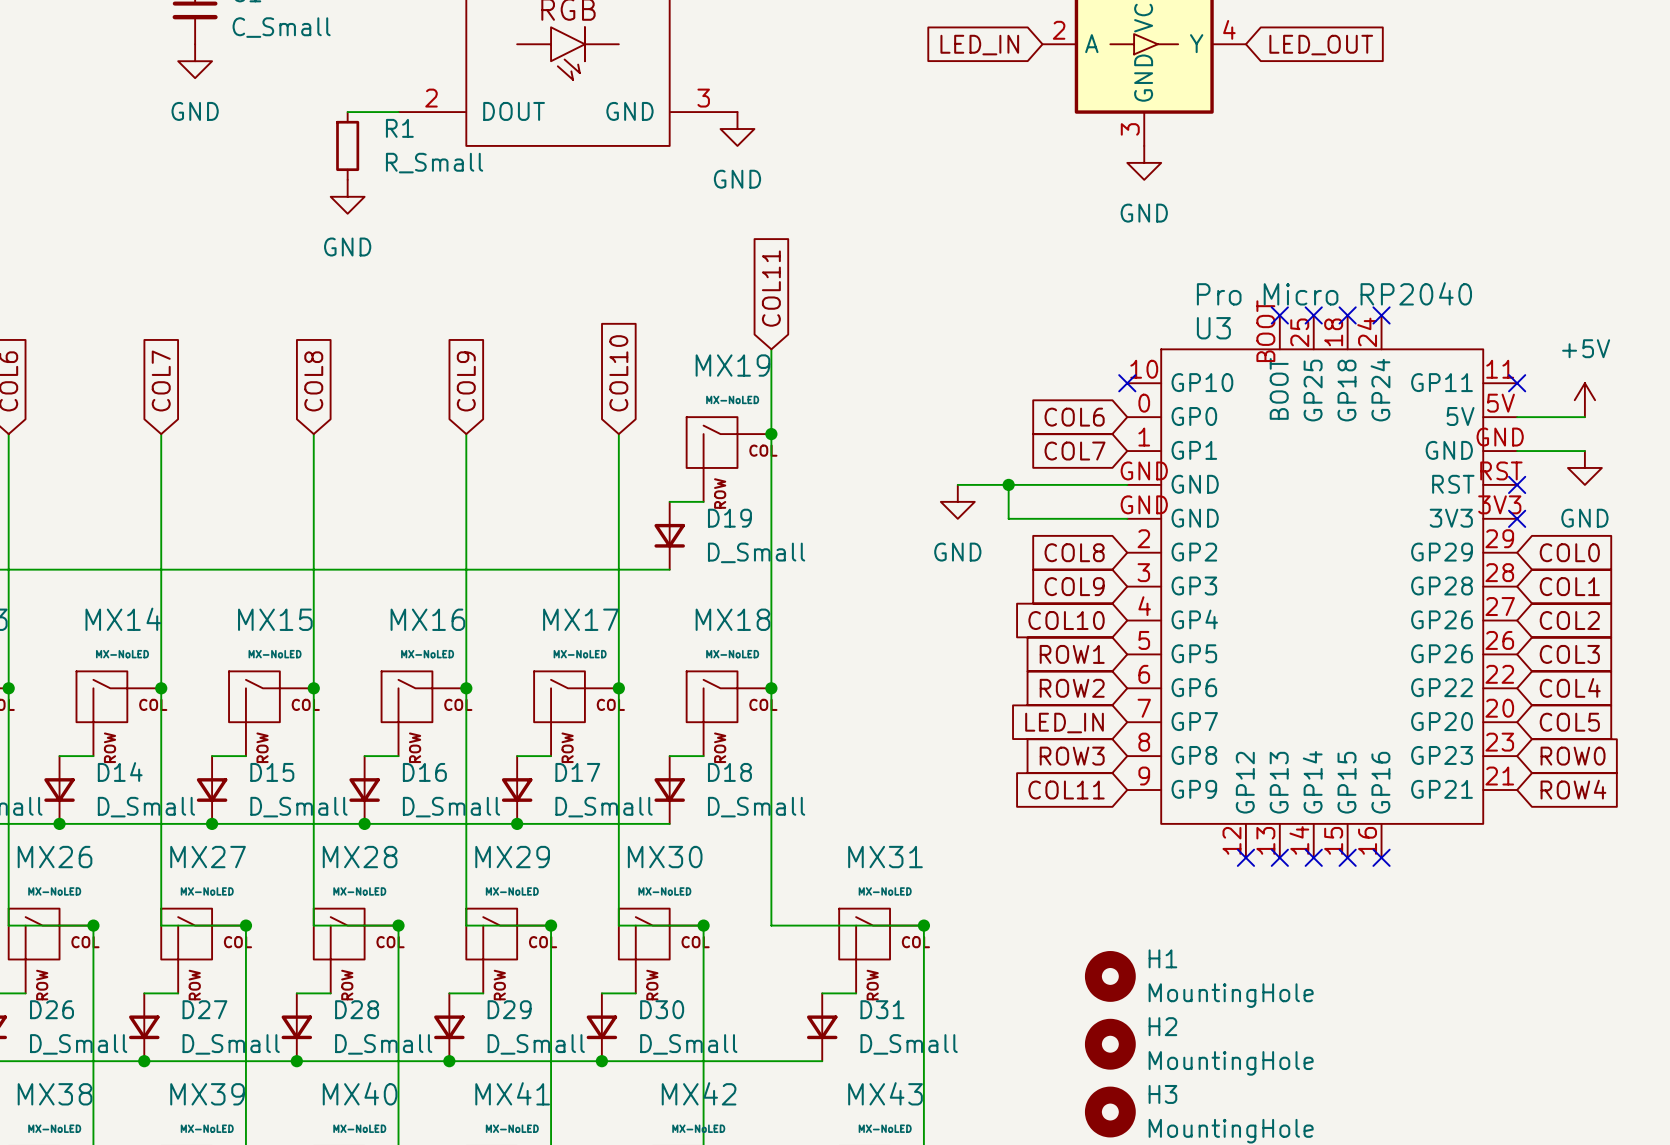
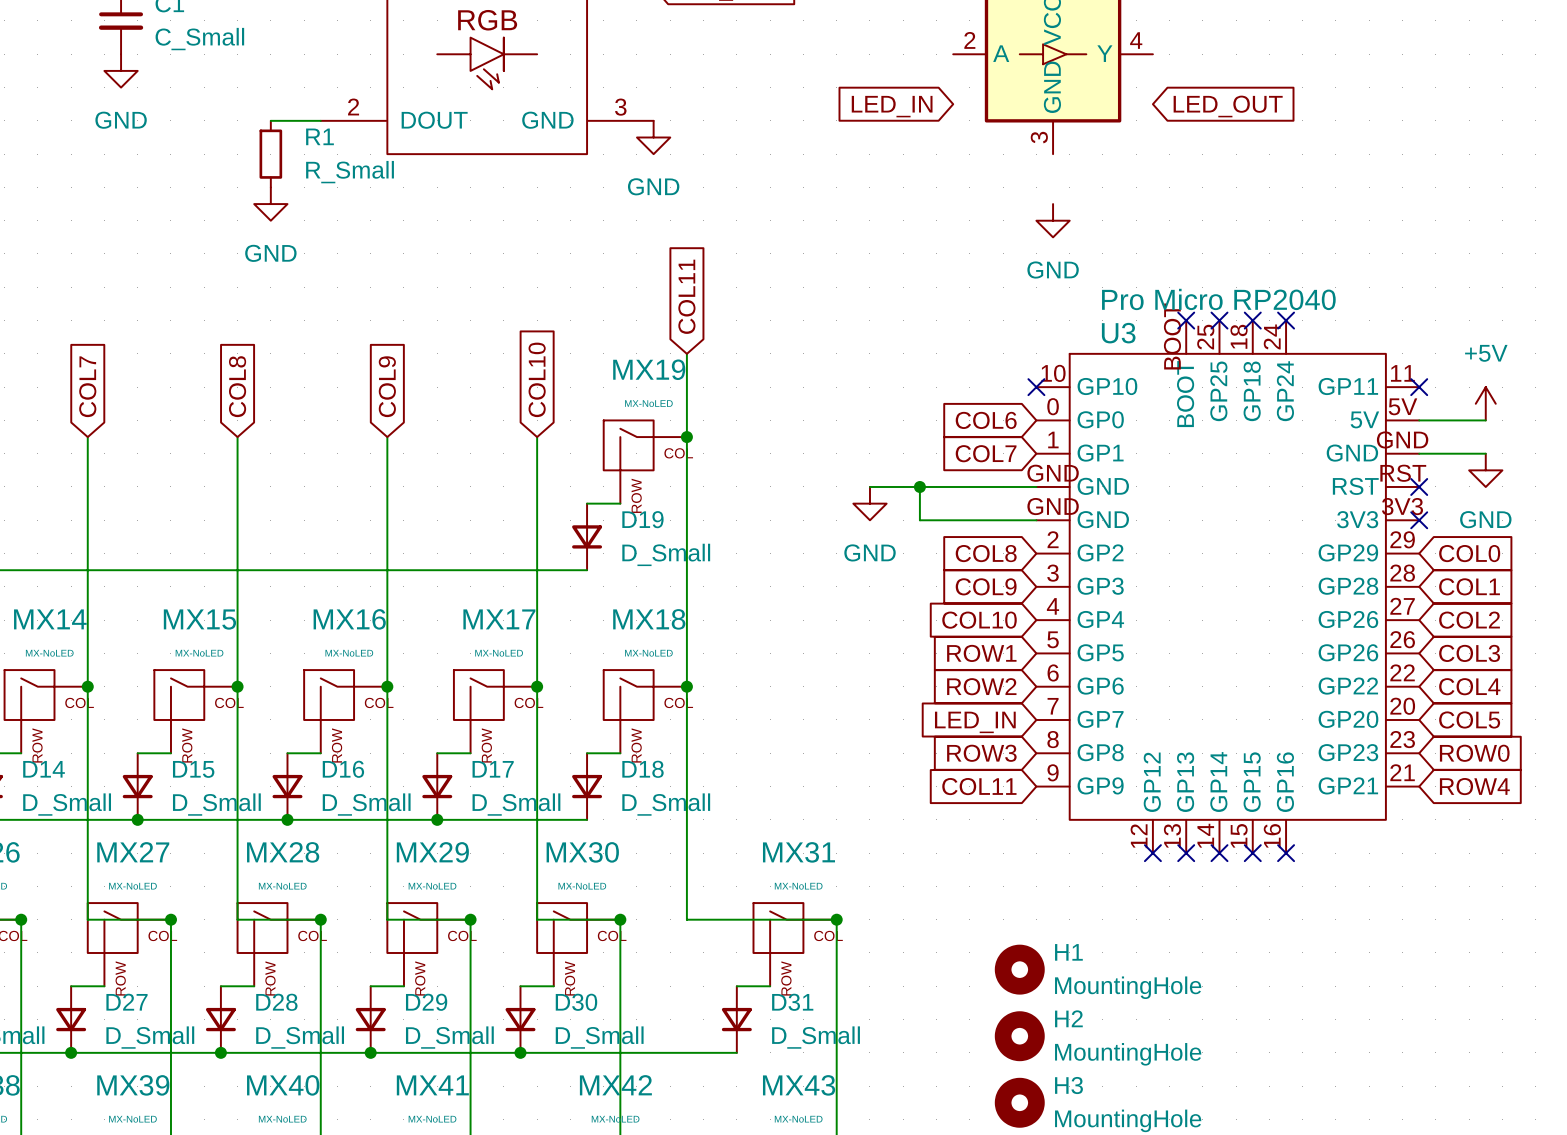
global label position: LED_IN (979, 45) -> LED_IN (892, 106)
global label position: LED_OUT (1321, 45) -> LED_OUT (1228, 106)
power symbol position: GND (1144, 162) -> GND (1053, 220)

